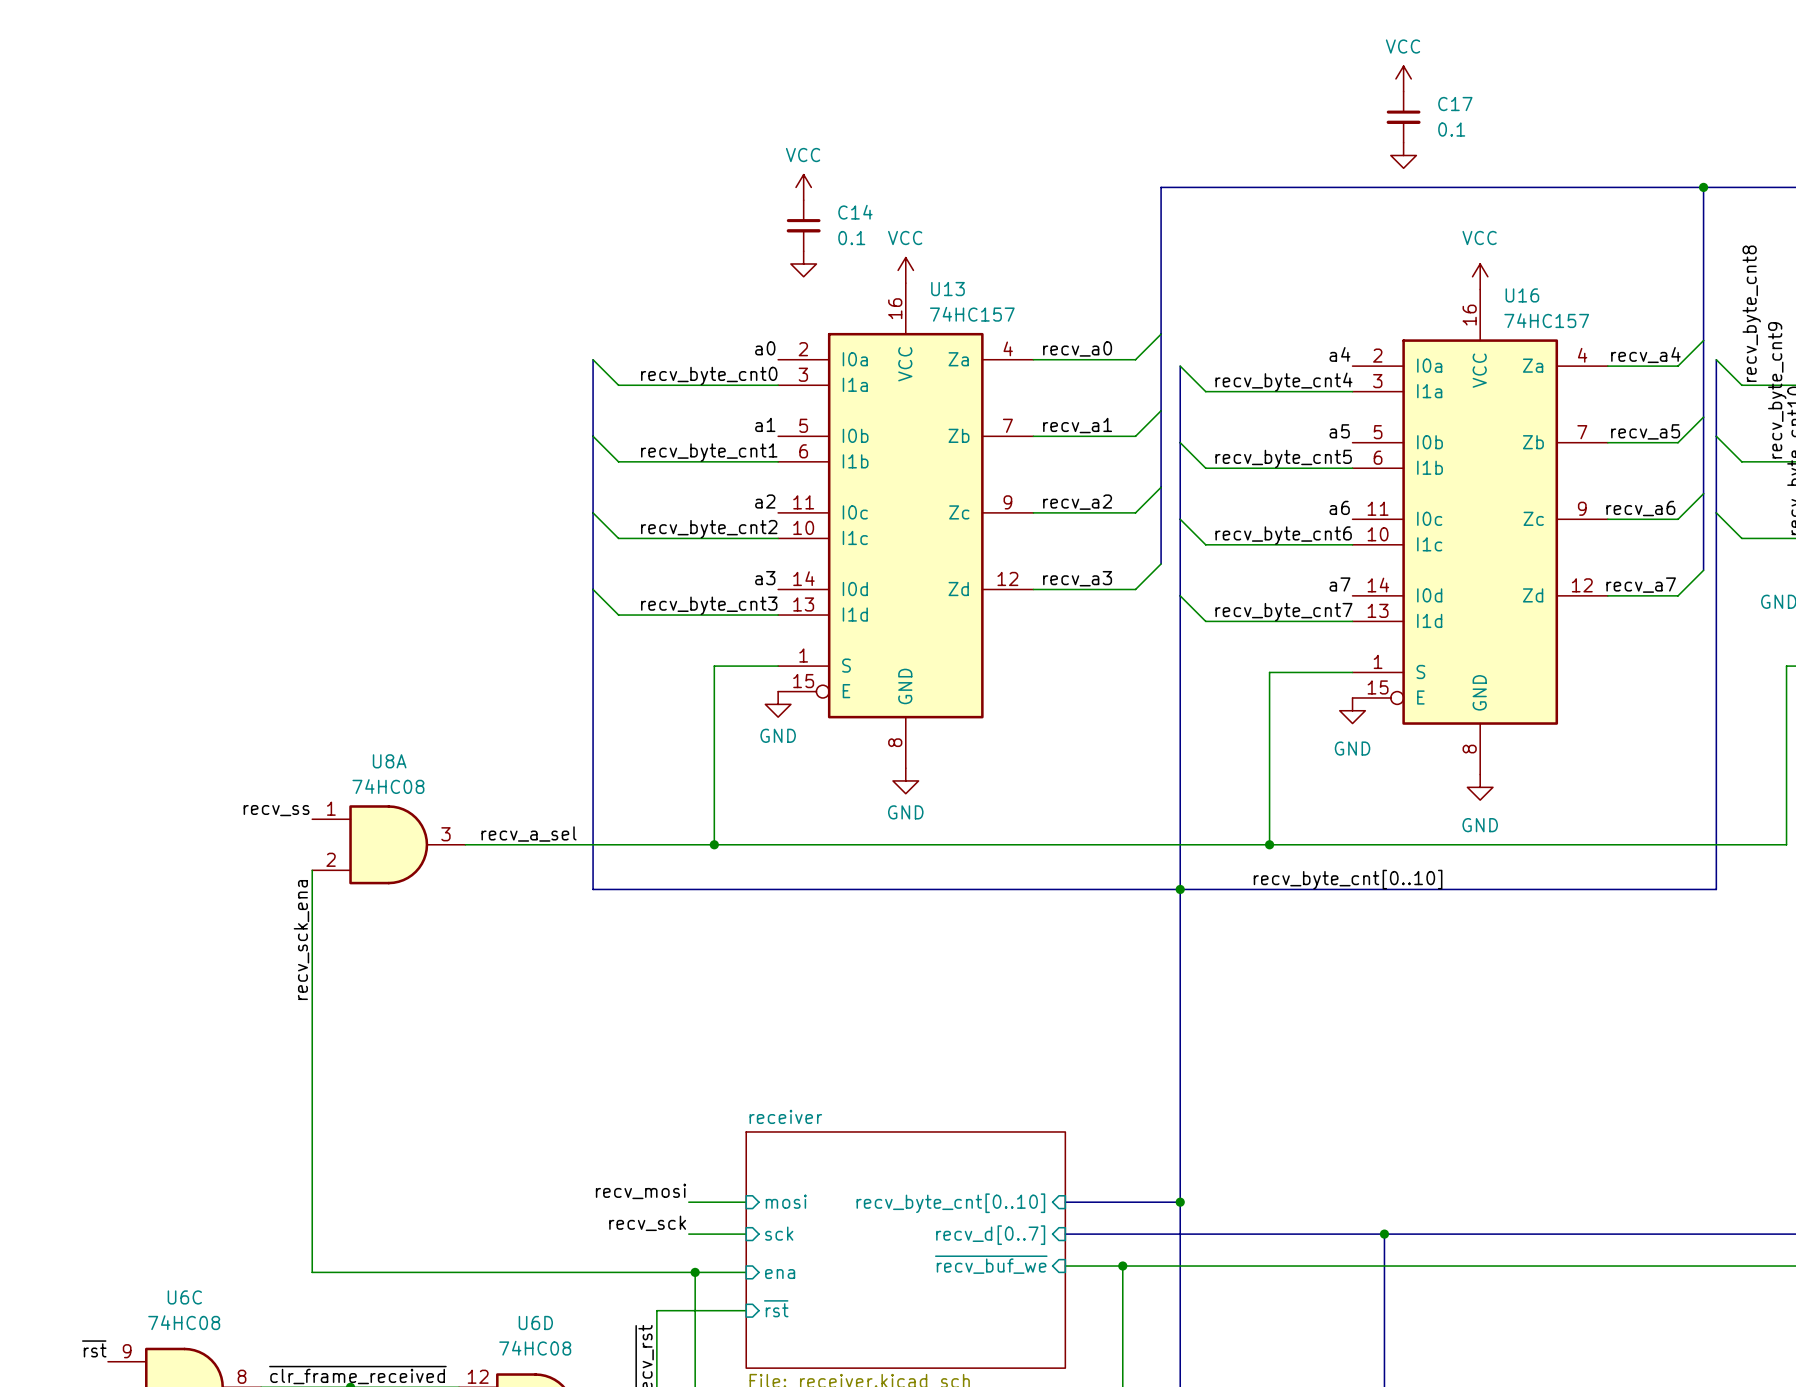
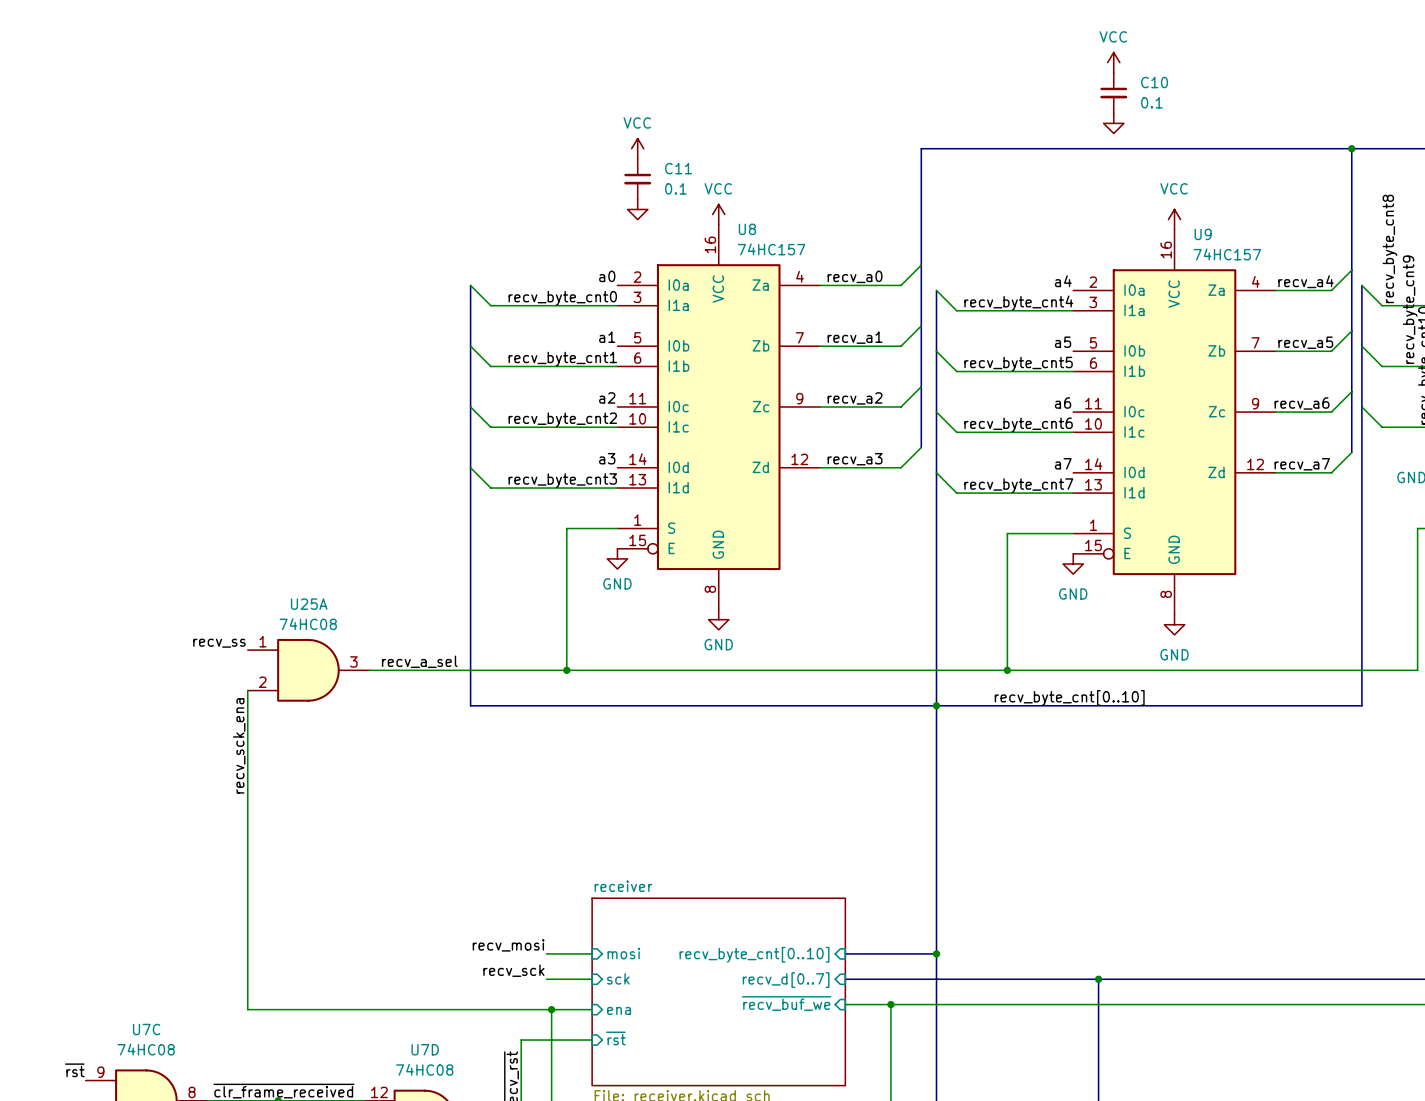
C17 name: C17 (1455, 104) -> C10 (1154, 82)
C14 name: C14 (855, 212) -> C11 (678, 168)
U13 name: U13 (947, 289) -> U8 (747, 229)
U16 name: U16 (1522, 295) -> U9 (1203, 234)
U8A name: U8A (389, 761) -> U25A (309, 604)
U6C name: U6C (184, 1297) -> U7C (146, 1029)
U6D name: U6D (535, 1322) -> U7D (425, 1049)

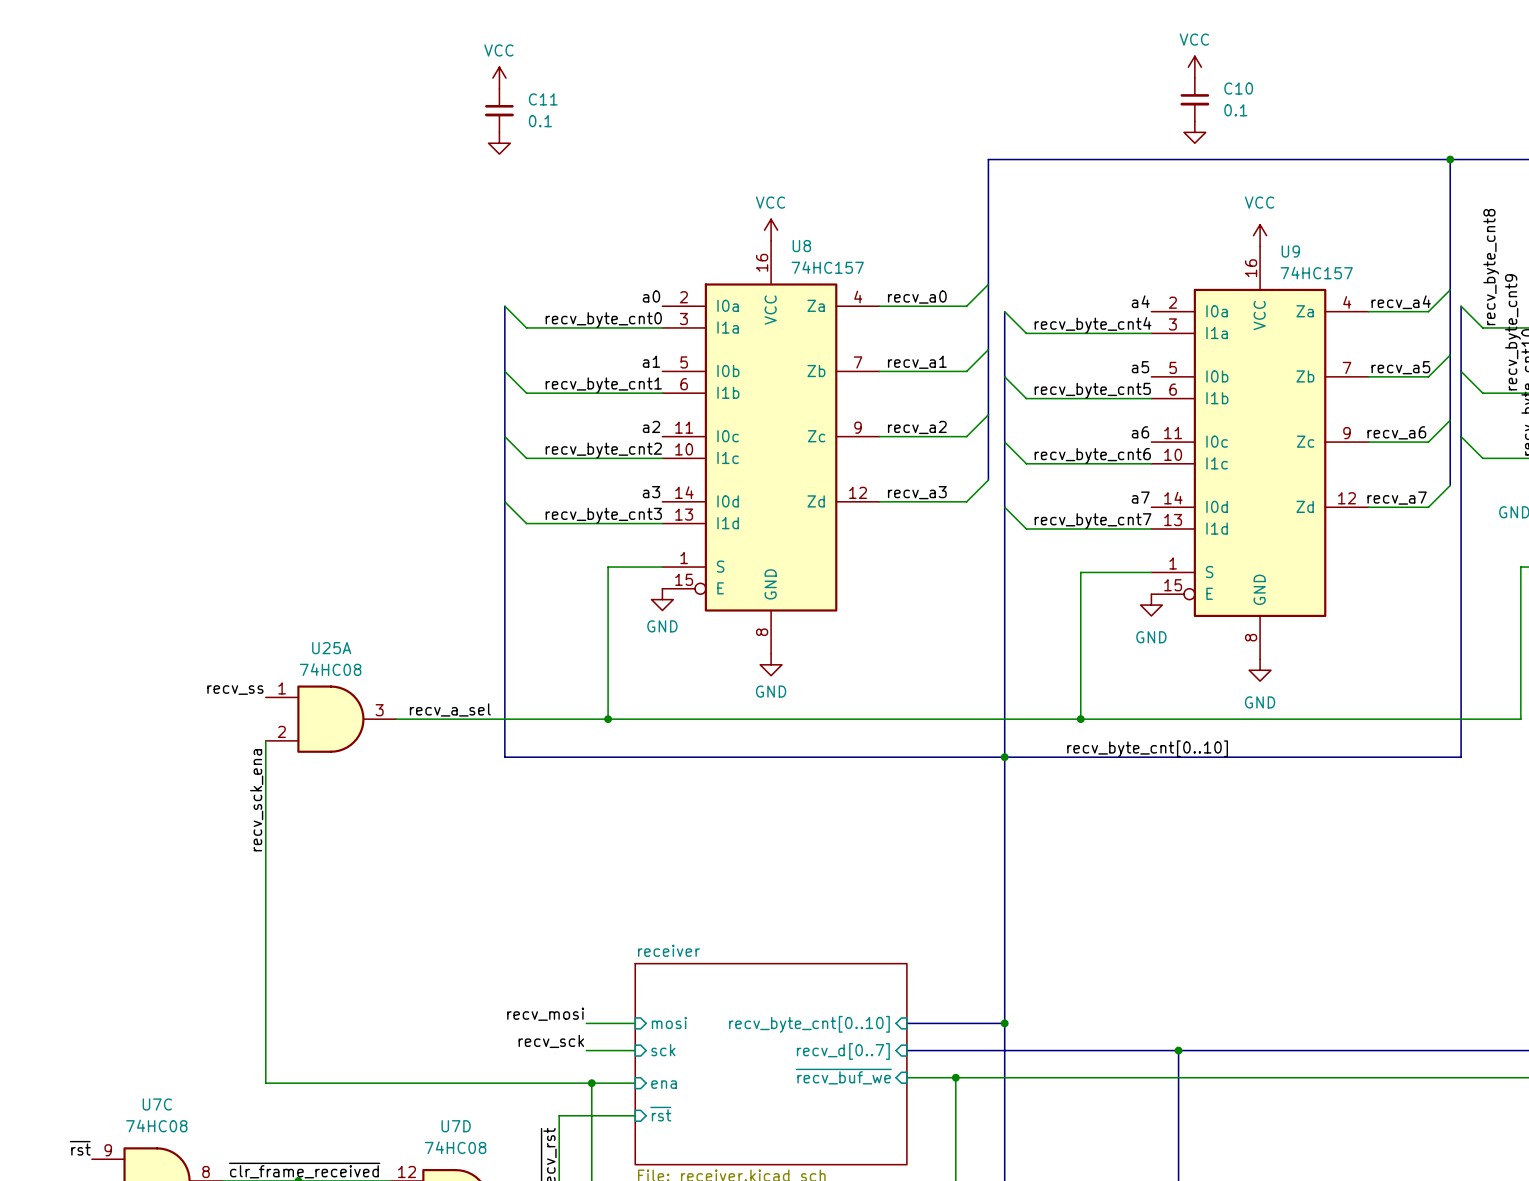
power symbol position: VCC (637, 148) -> VCC (499, 78)
C11 position: (637, 179) -> (499, 110)
power symbol position: (637, 209) -> (499, 143)

